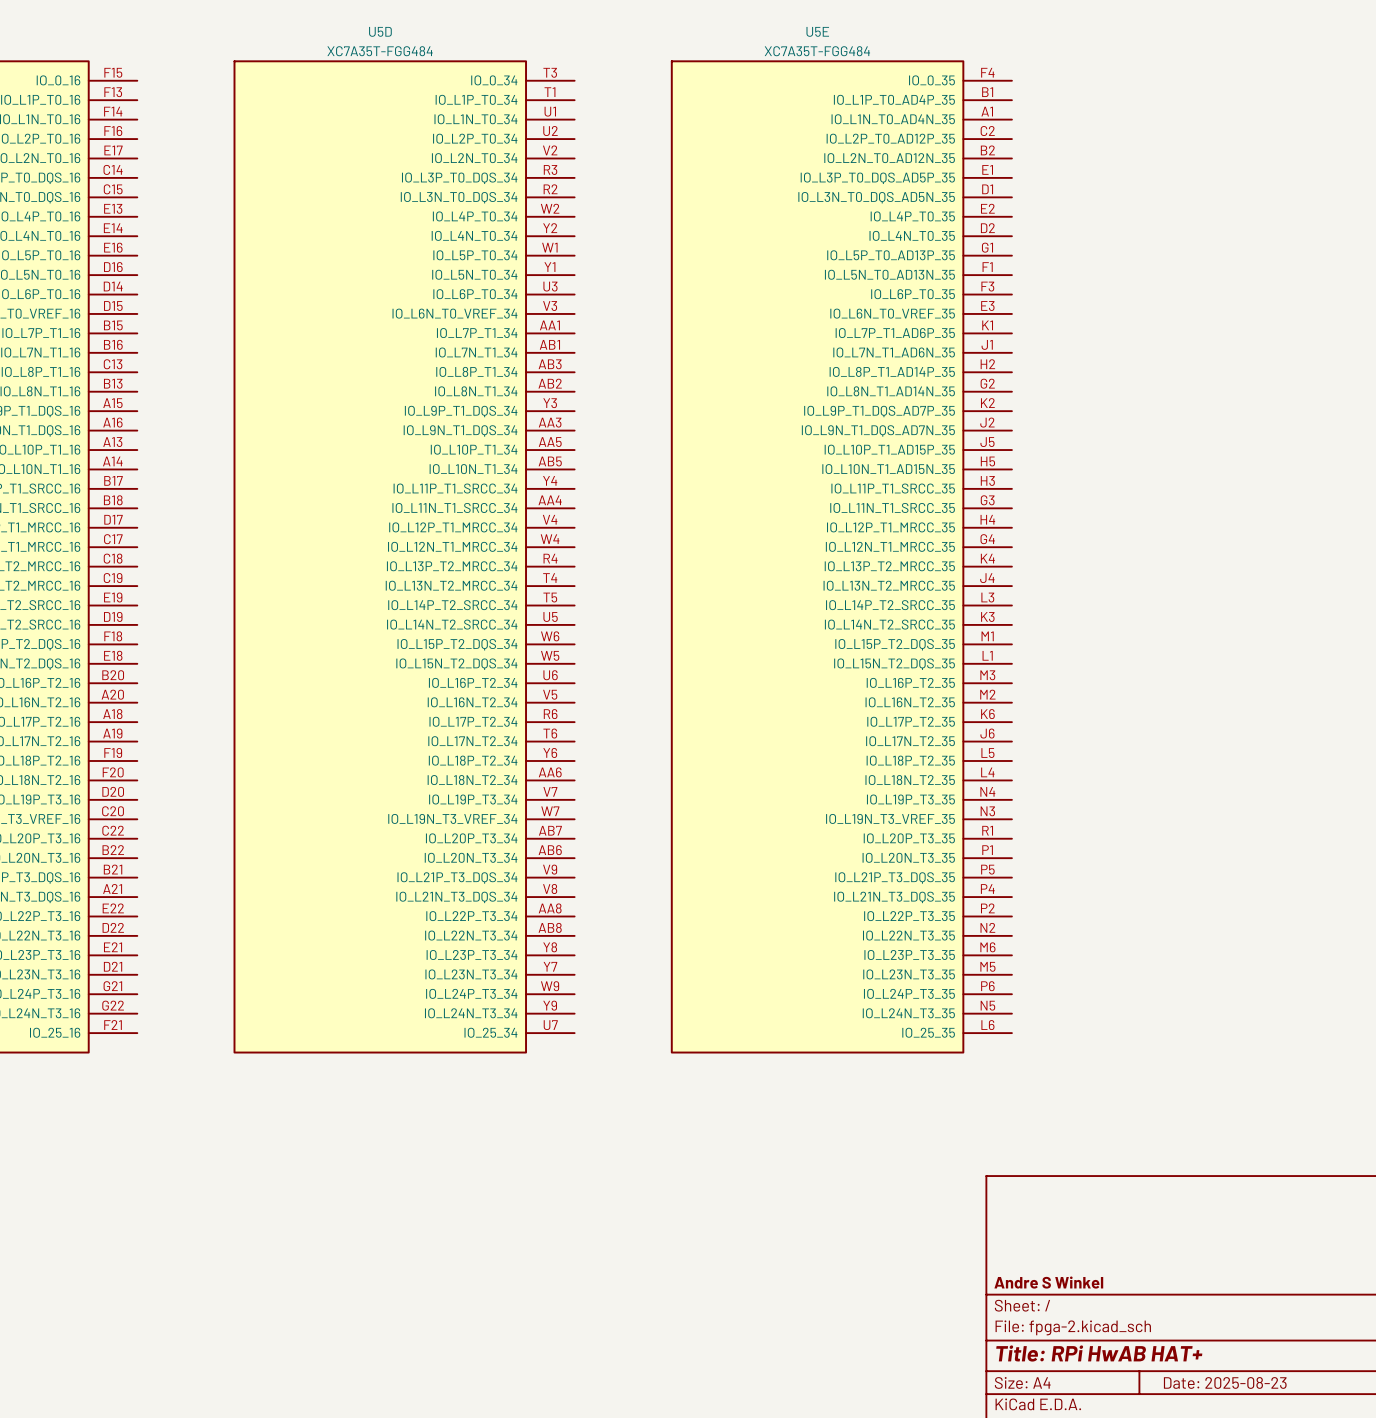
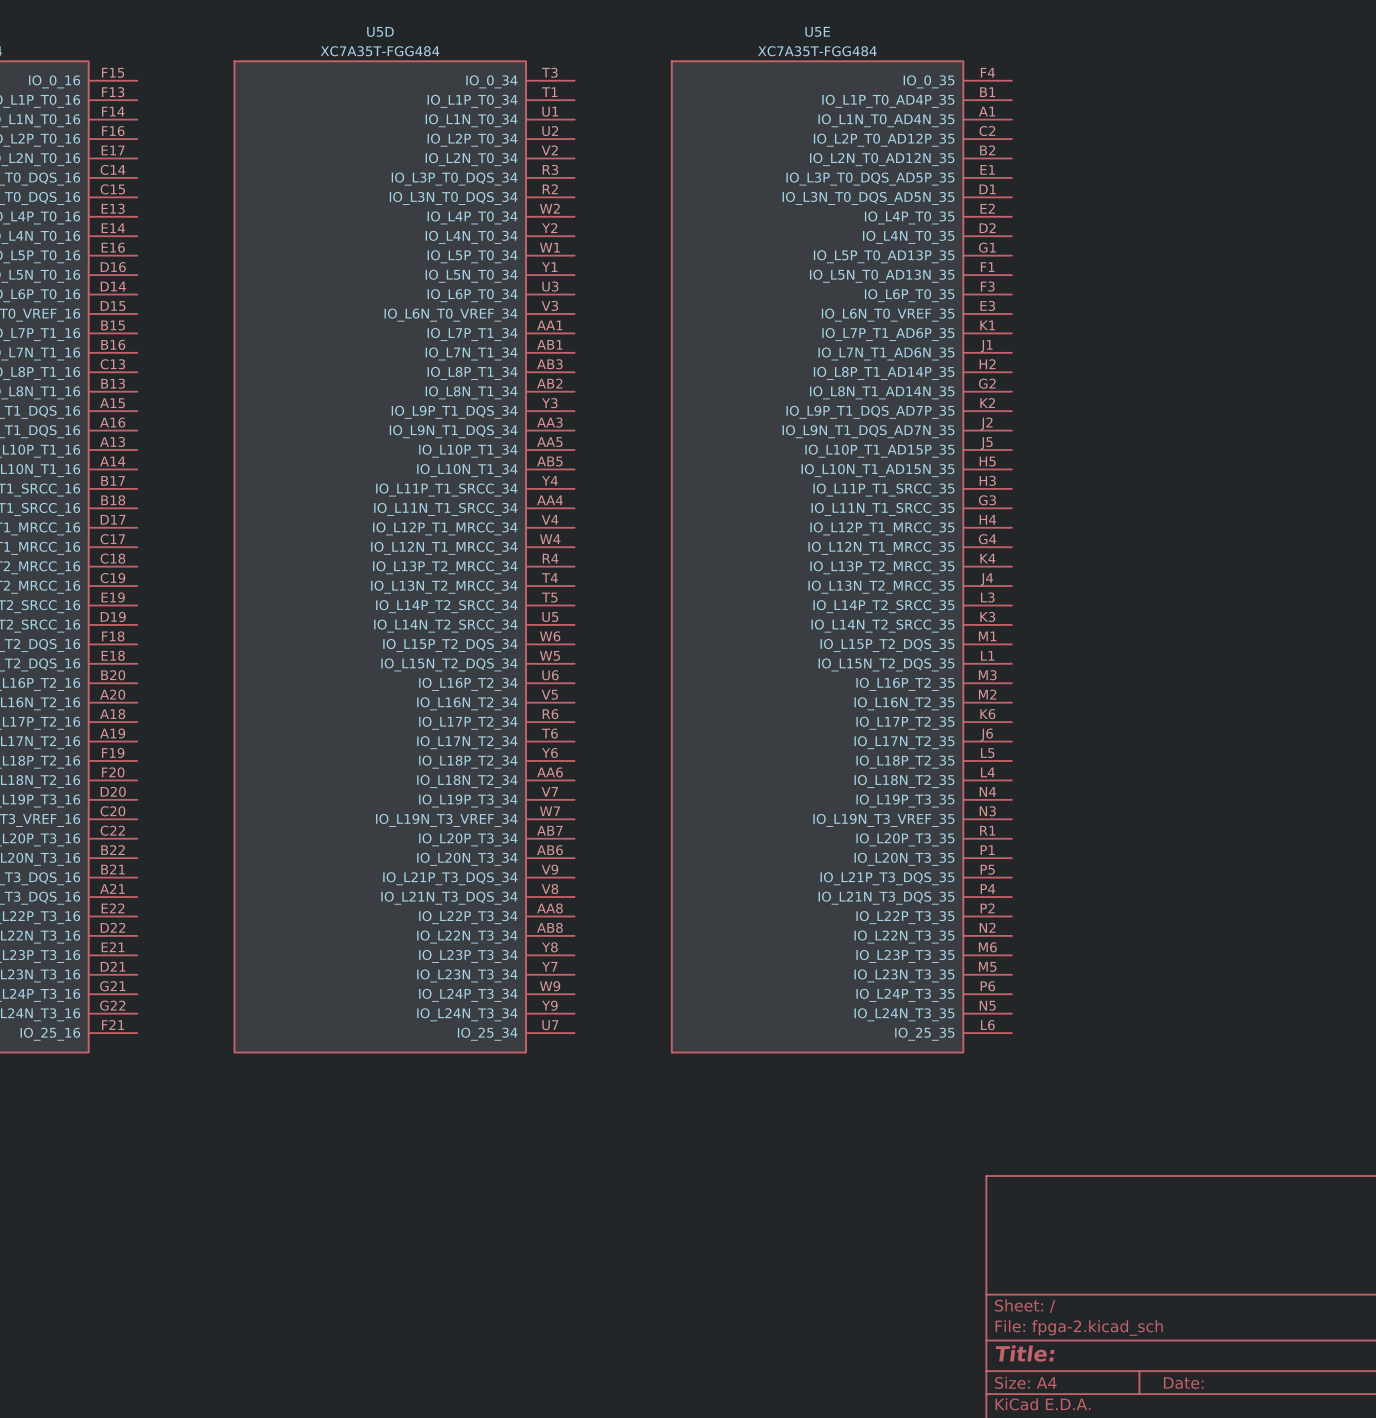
title block: Andre S Winkel (1048, 1282) -> none
title block: Title: RPi HwAB HAT+ (1099, 1353) -> Title: (1025, 1353)
title block: Date: 2025-08-23 (1225, 1382) -> Date: (1183, 1383)

